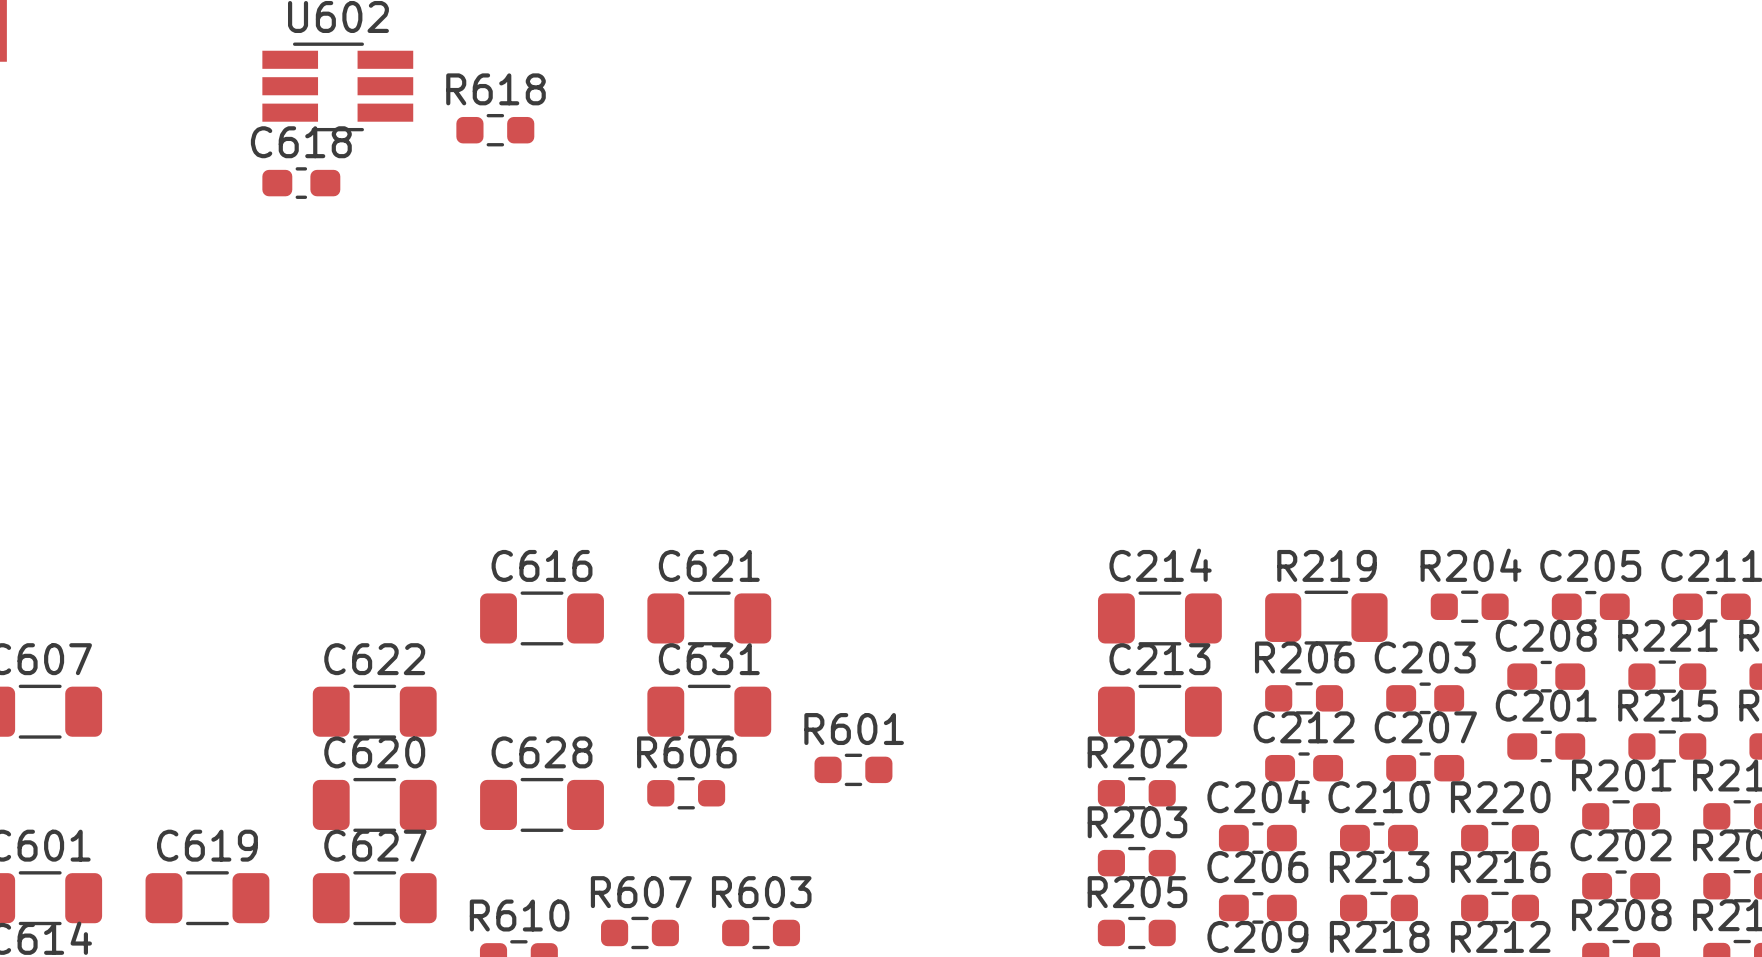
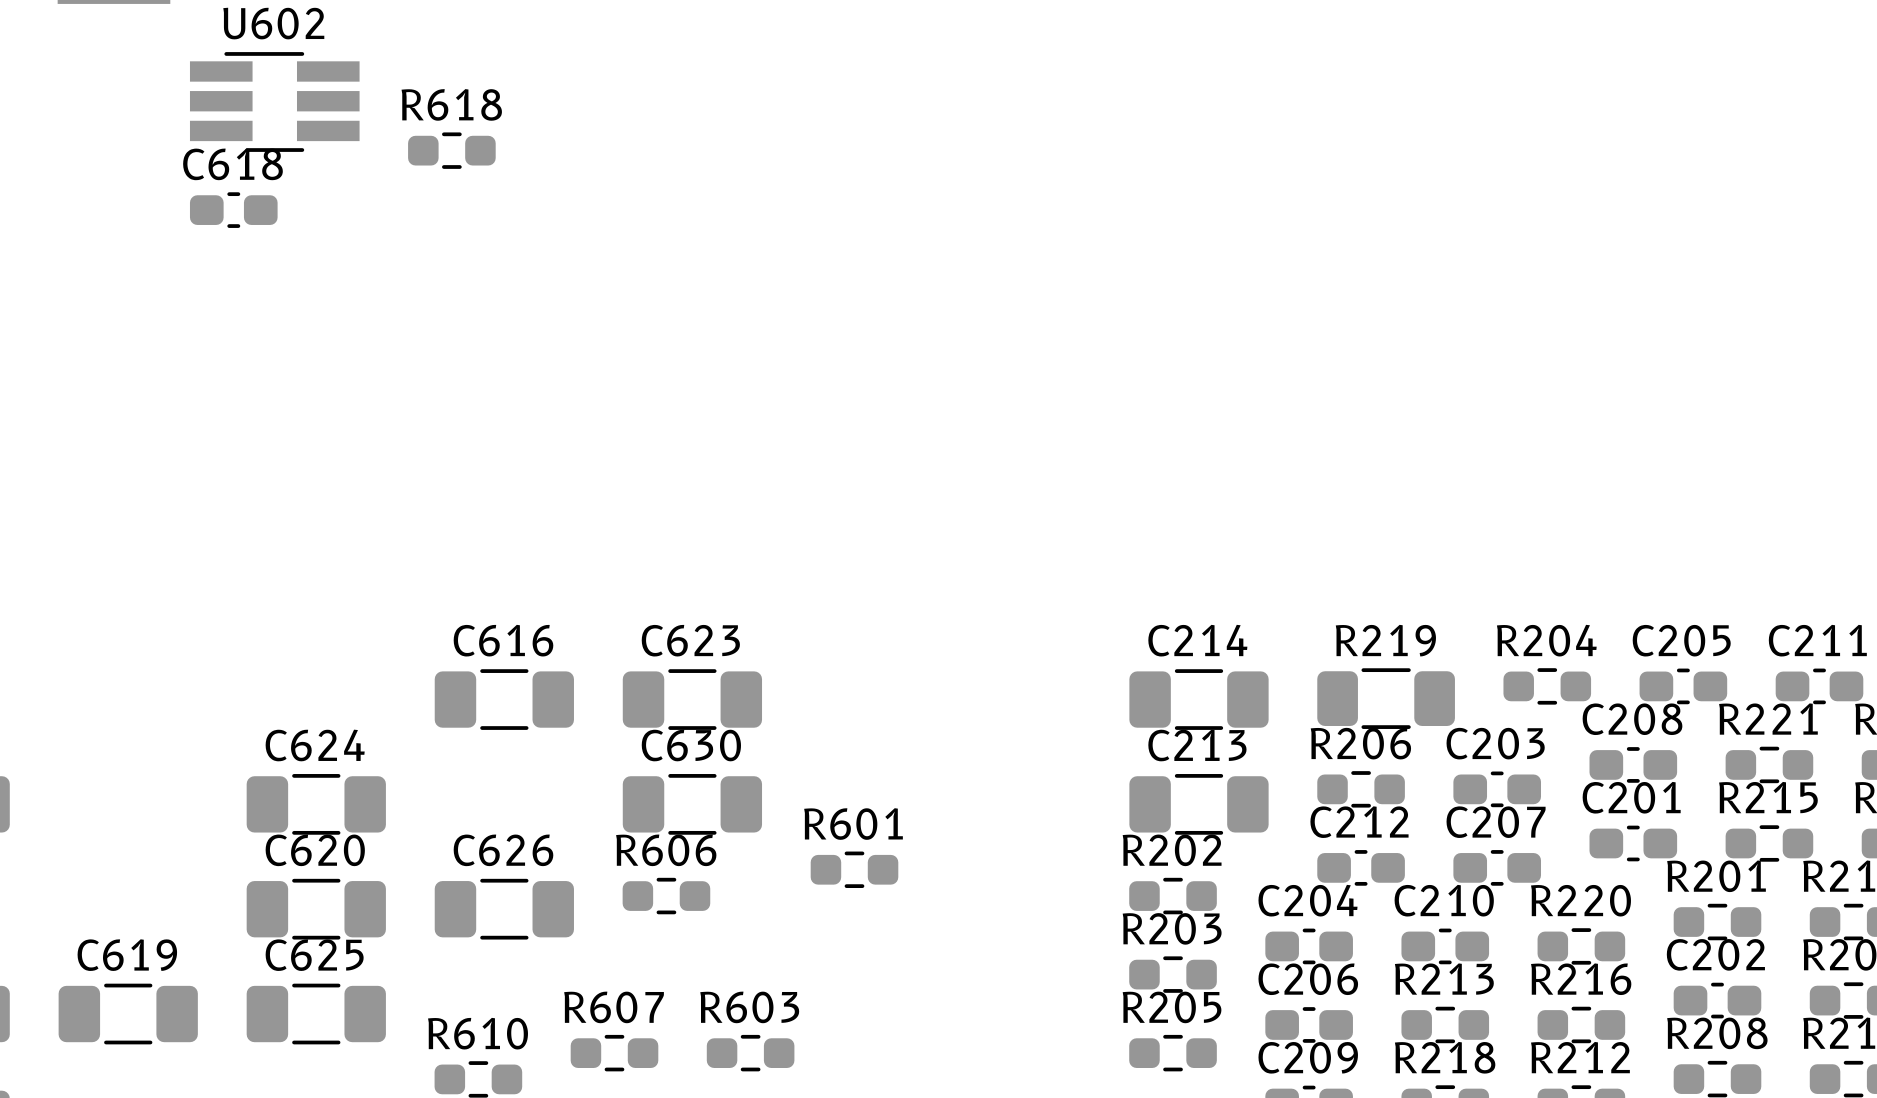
C621 name: C621 (709, 565) -> C623 (690, 640)
C622 name: C622 (374, 659) -> C624 (315, 745)
C631 name: C631 (709, 659) -> C630 (691, 745)
C628 name: C628 (542, 752) -> C626 (503, 850)
C627 name: C627 (375, 845) -> C625 (314, 955)

